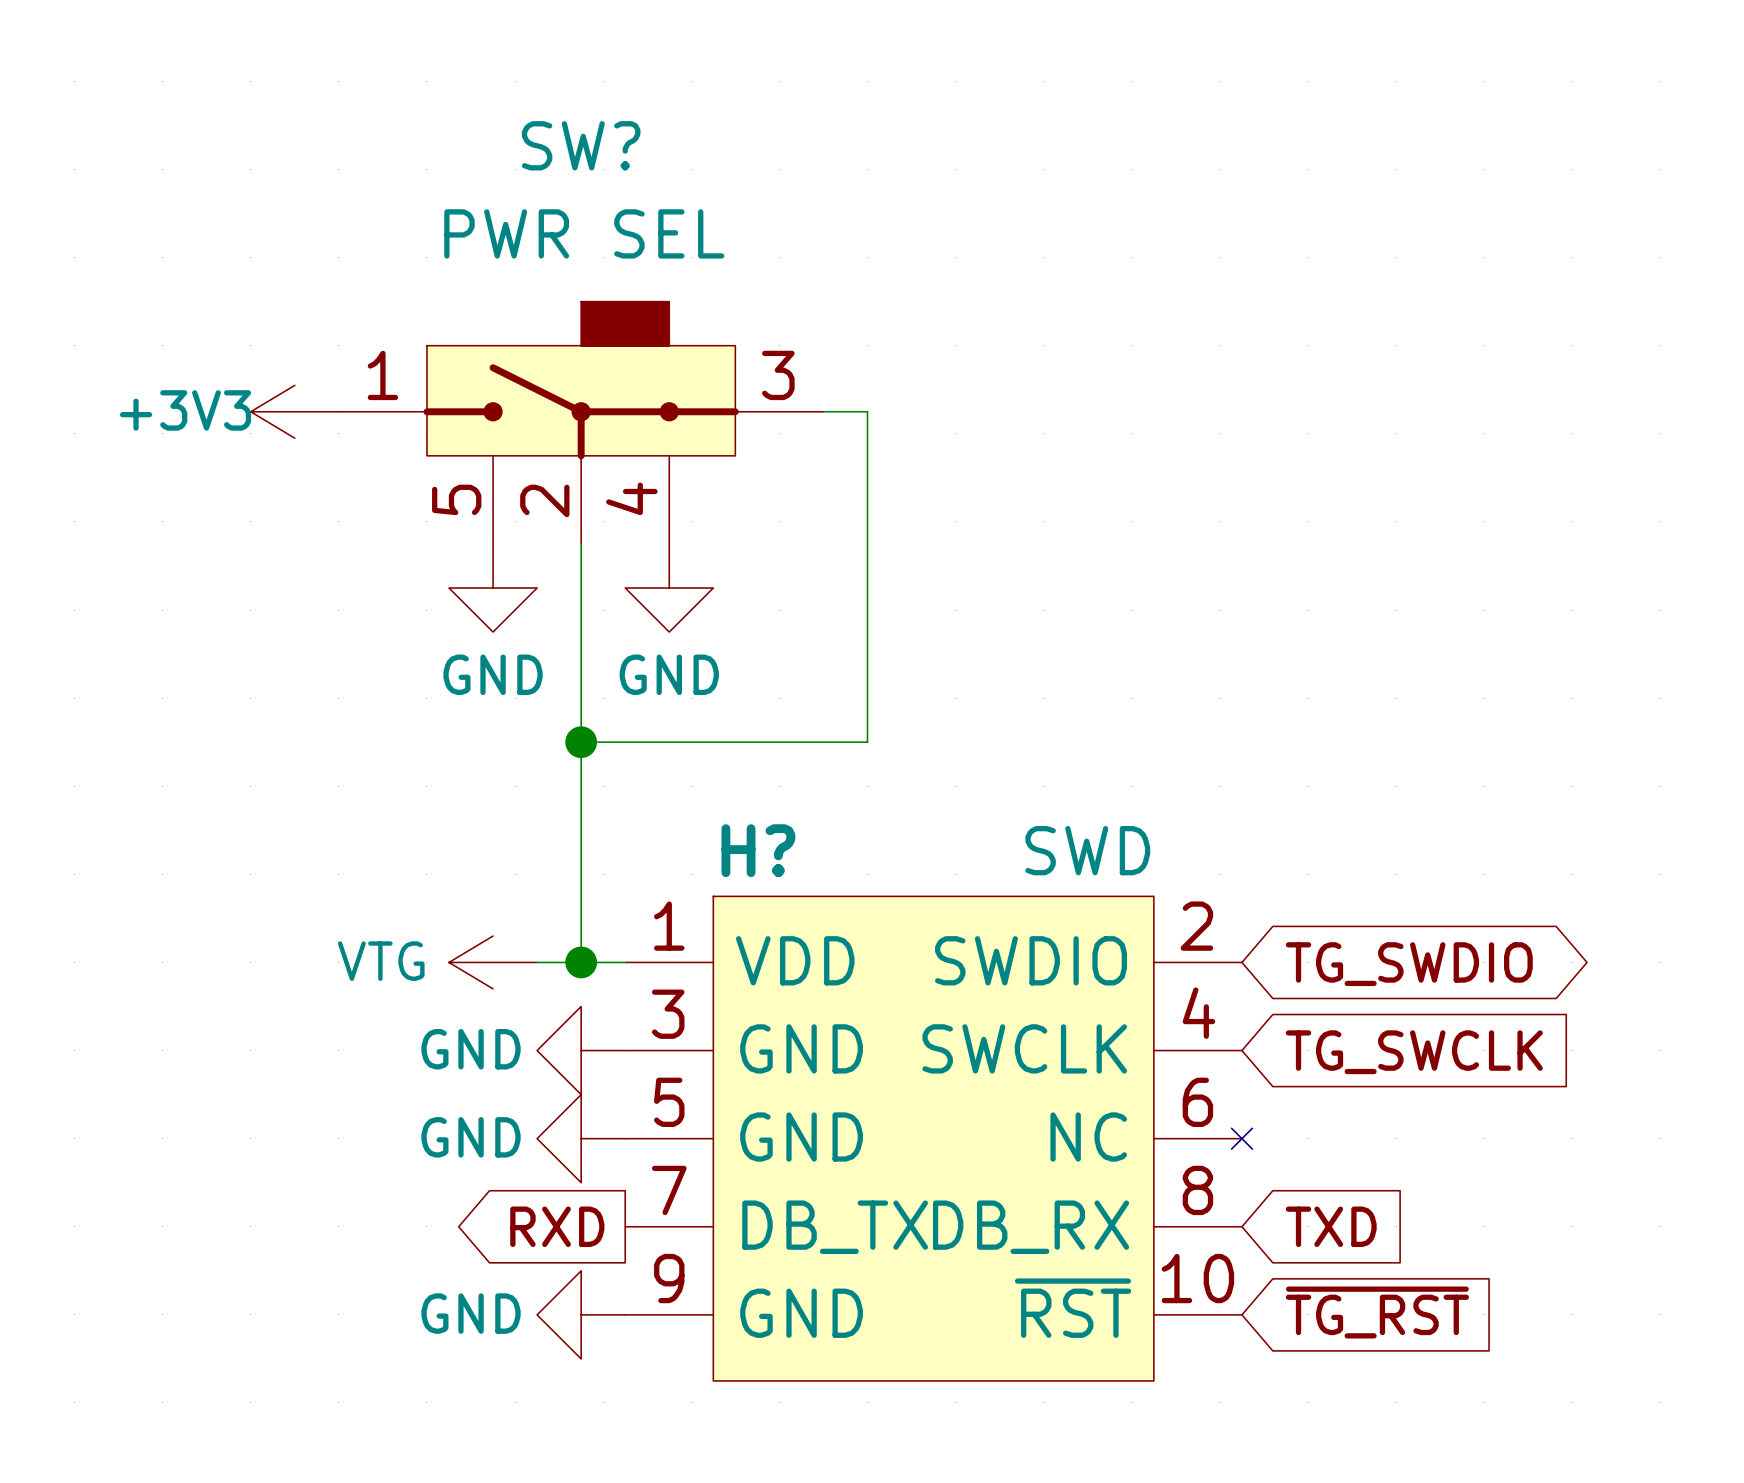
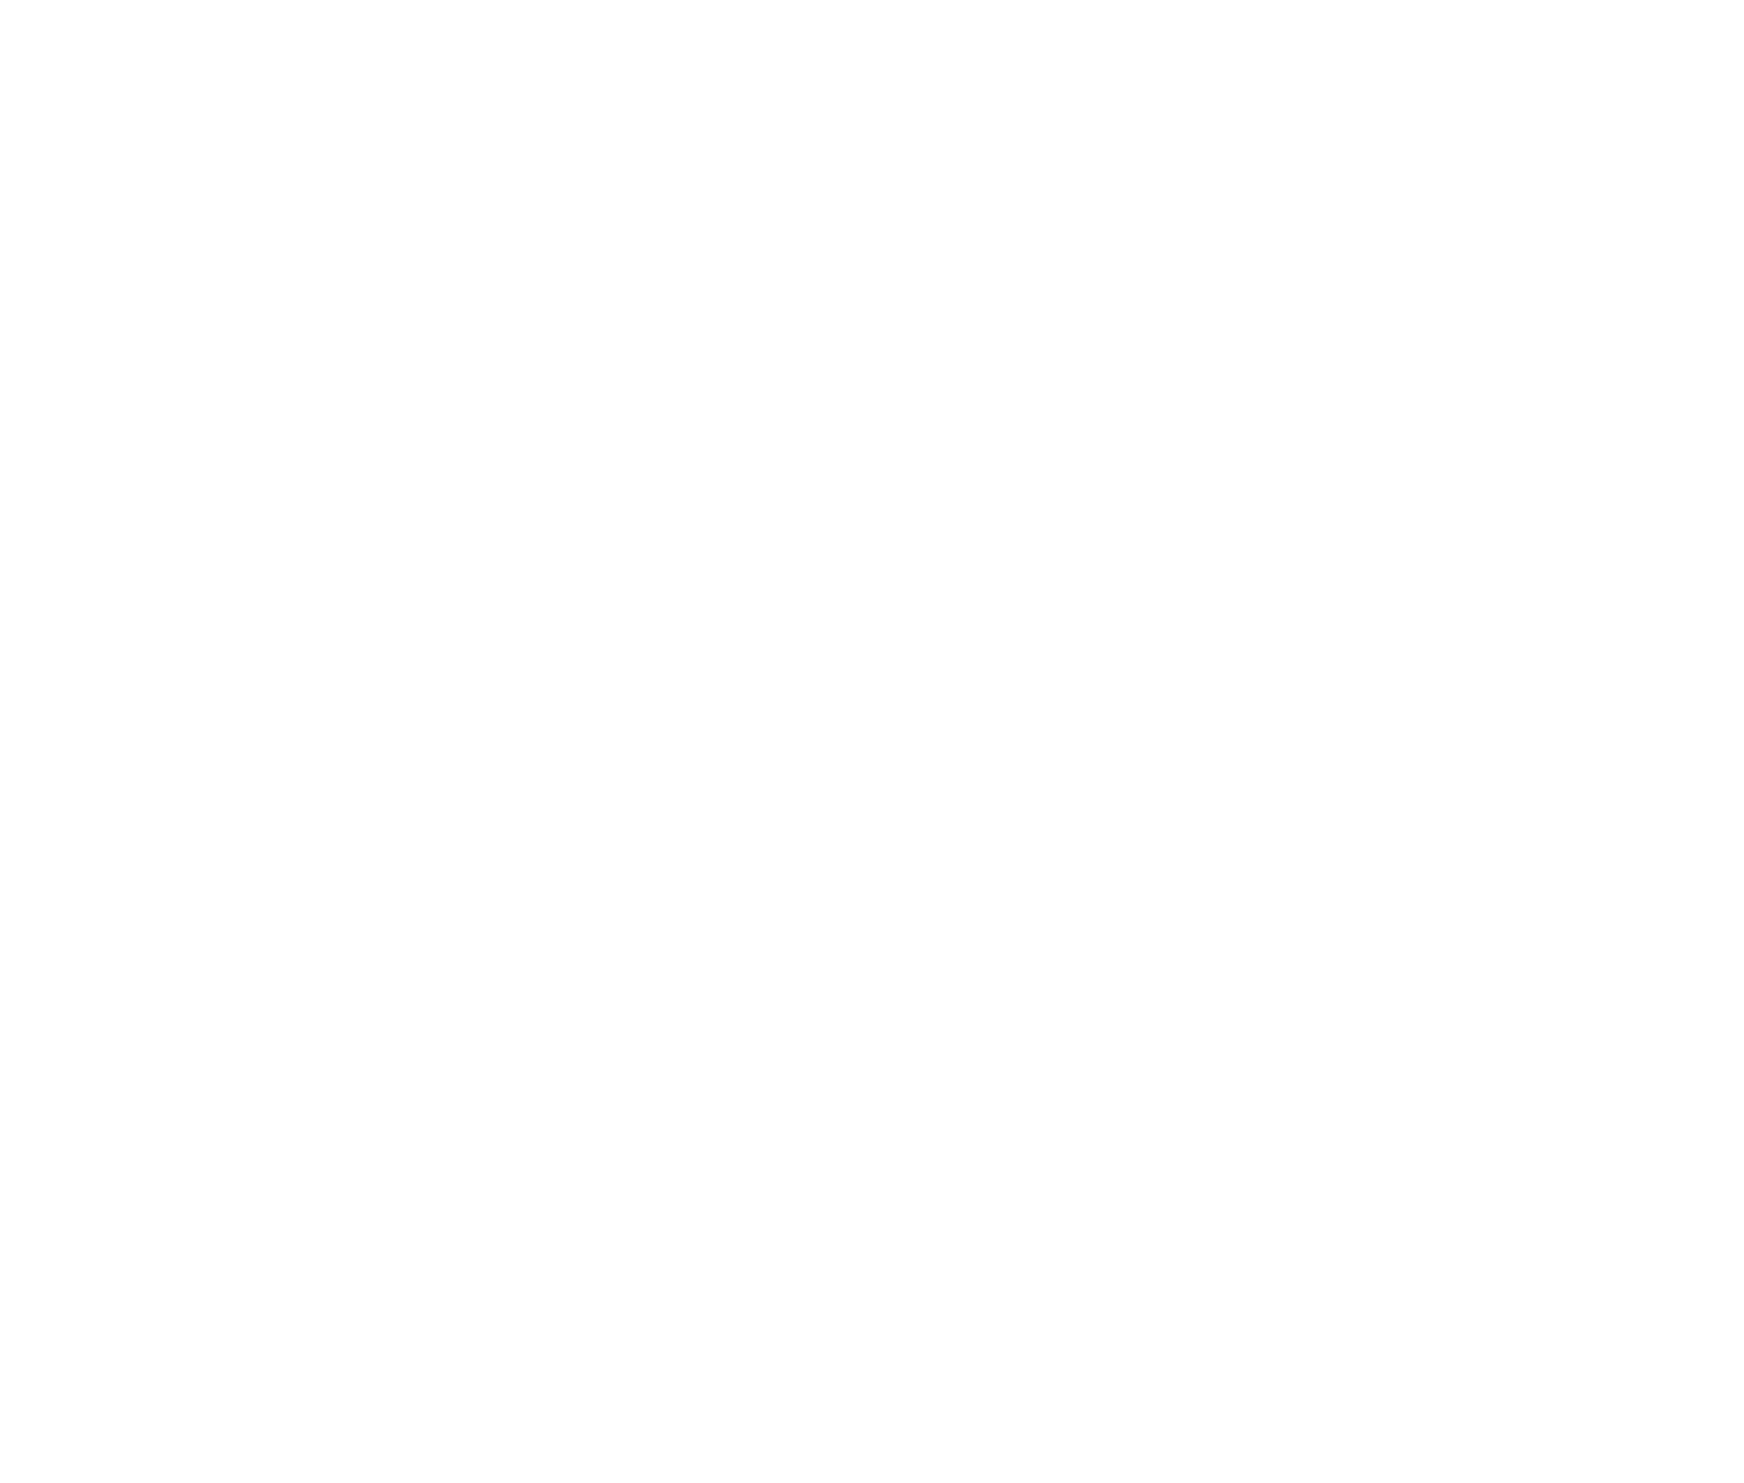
power symbol: +3V3 (294, 411) -> none
wire: (823, 411) (867, 411) (867, 742) (581, 742) -> none
SW?: PWR SEL (581, 422) -> none
wire: (581, 543) (581, 962) -> none
power symbol: GND (493, 587) -> none
power symbol: GND (669, 587) -> none
junction: (581, 742) -> none
power symbol: VTG (493, 962) -> none
wire: (537, 962) (625, 962) -> none
junction: (581, 962) -> none
global label: TG_SWDIO (1409, 964) -> none
power symbol: GND (581, 1050) -> none
global label: TG_SWCLK (1414, 1052) -> none
power symbol: GND (581, 1138) -> none
H?: SWD (938, 1138) -> none
global label: RXD (557, 1226) -> none
global label: TXD (1331, 1226) -> none
global label: ~{TG_RST} (1377, 1312) -> none
power symbol: GND (581, 1314) -> none

